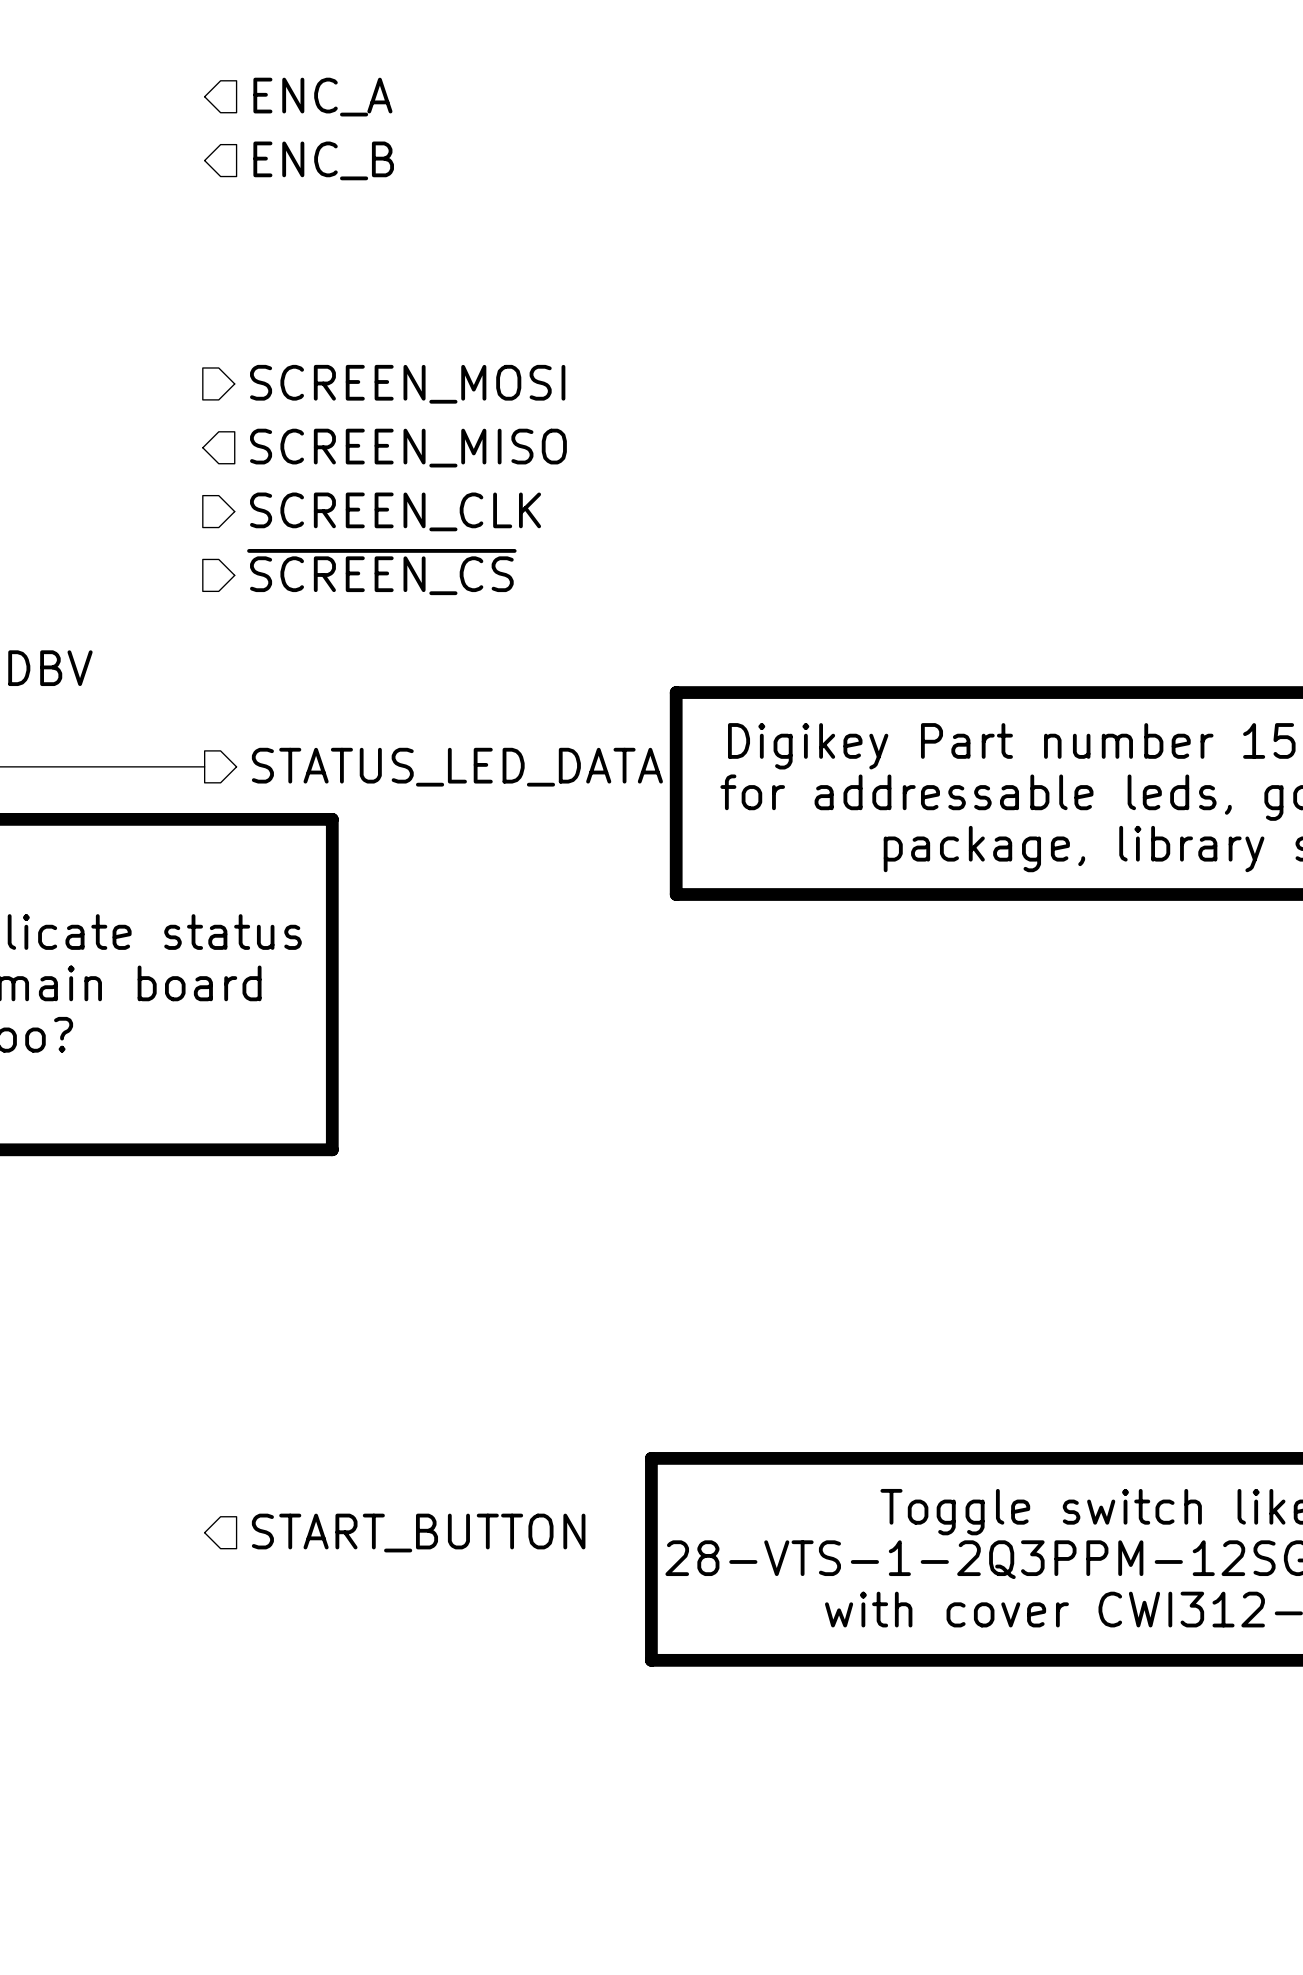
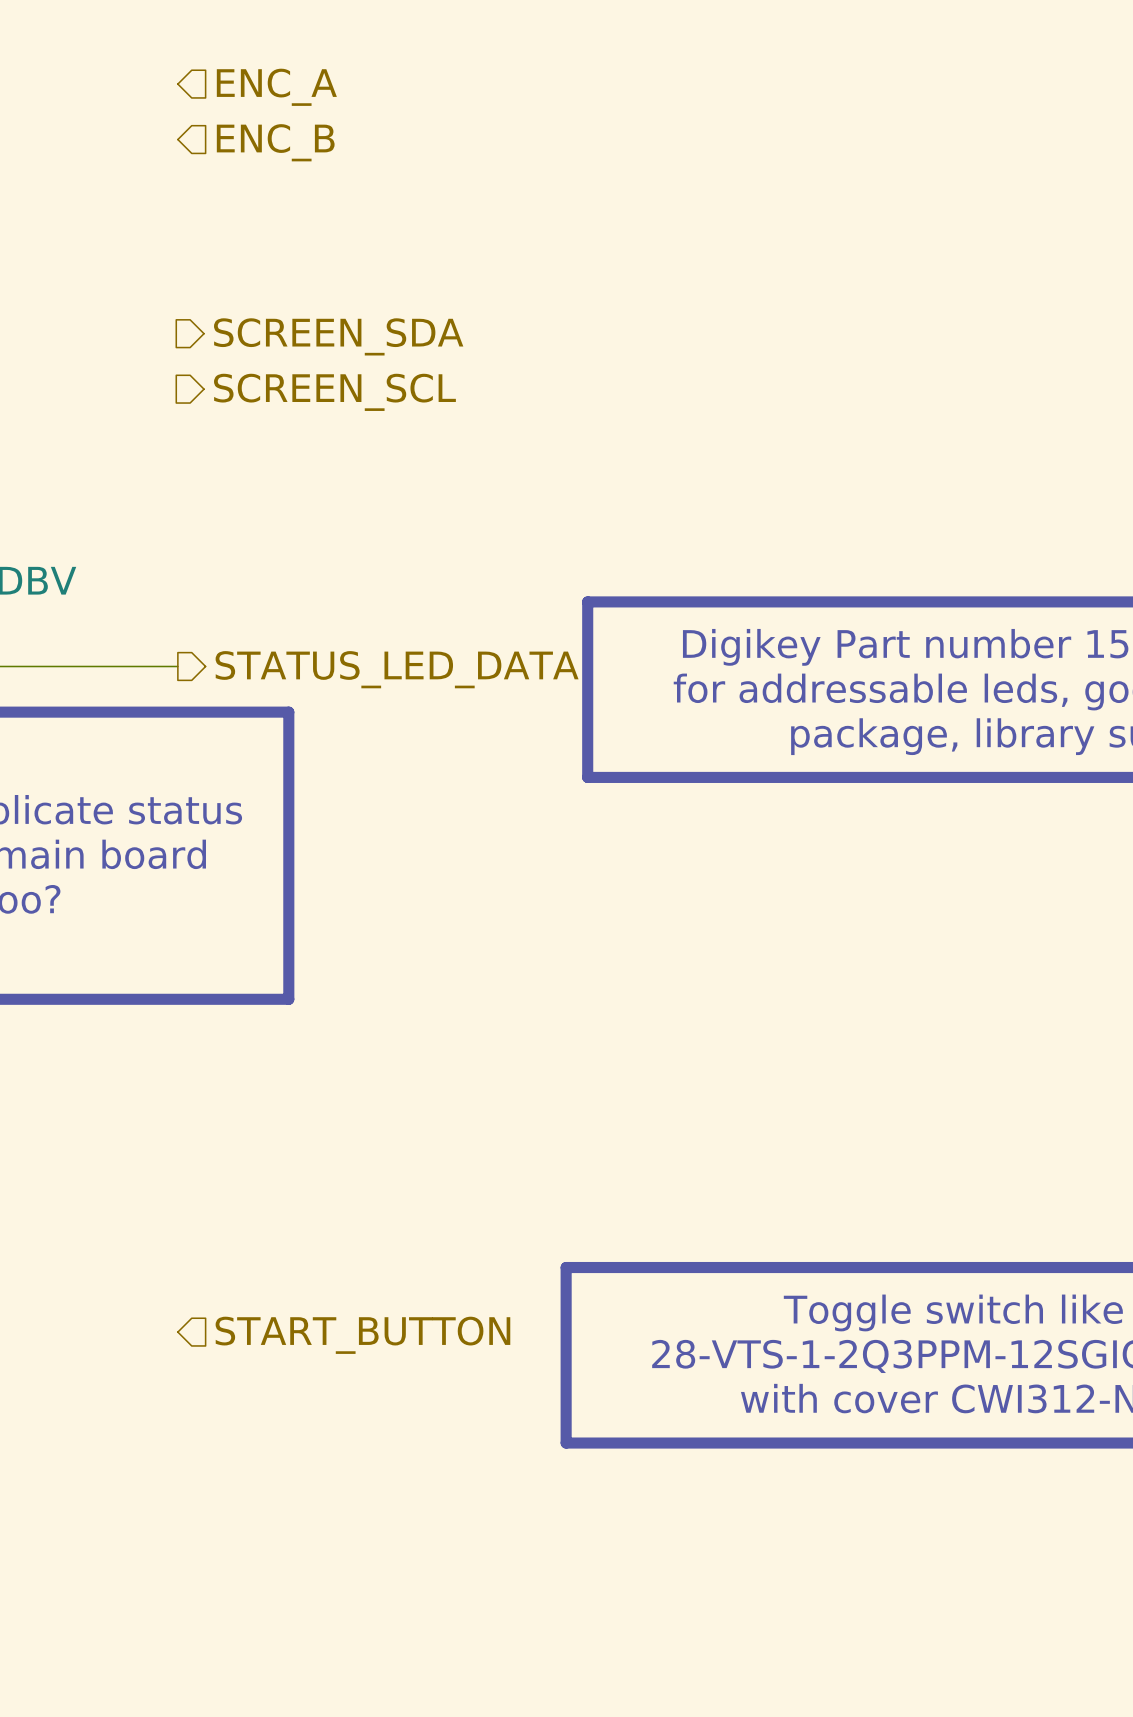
hierarchical label: SCREEN_MOSI (407, 384) -> SCREEN_SDA (338, 336)
hierarchical label shape: input (408, 448) -> output (334, 392)
hierarchical label: SCREEN_MISO (408, 448) -> SCREEN_SCL (334, 392)
hierarchical label: SCREEN_CLK (395, 511) -> none
hierarchical label: ~{SCREEN_CS} (381, 572) -> none

